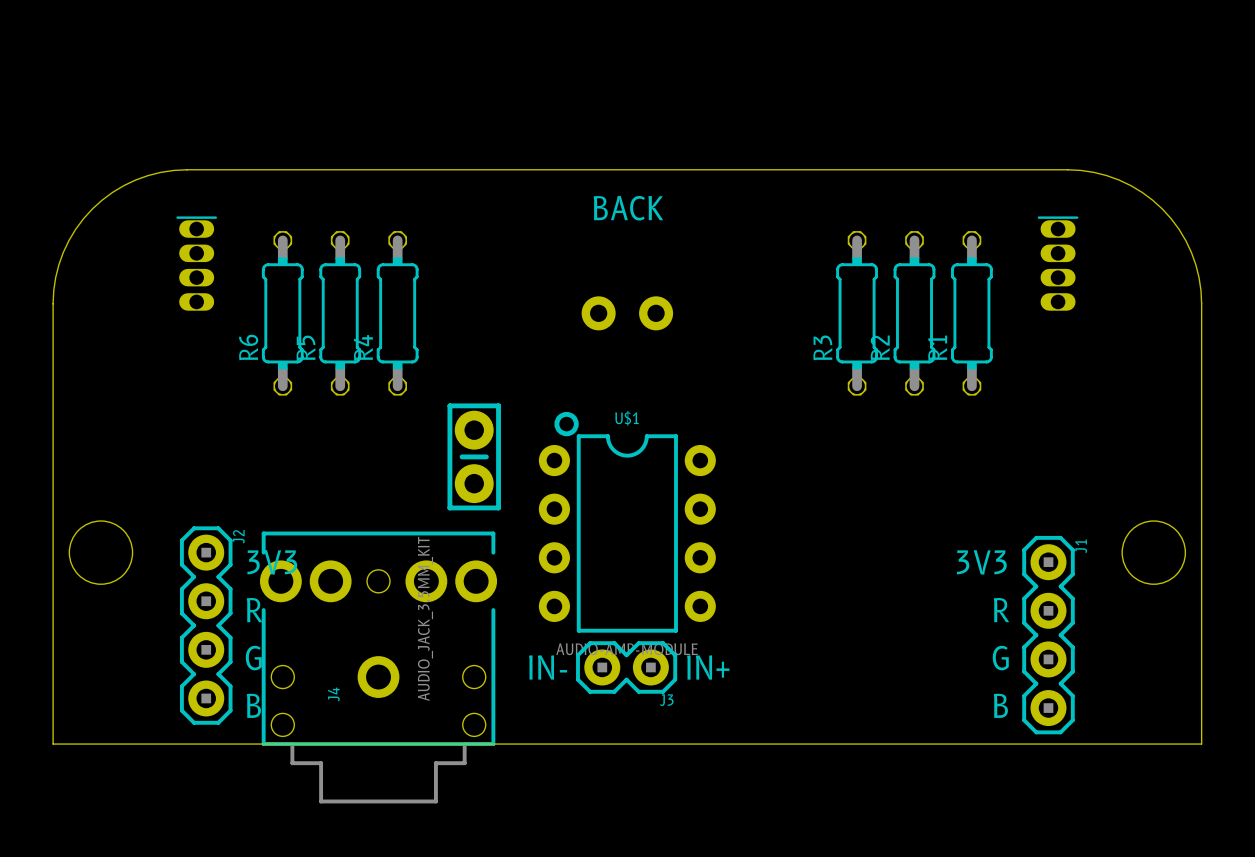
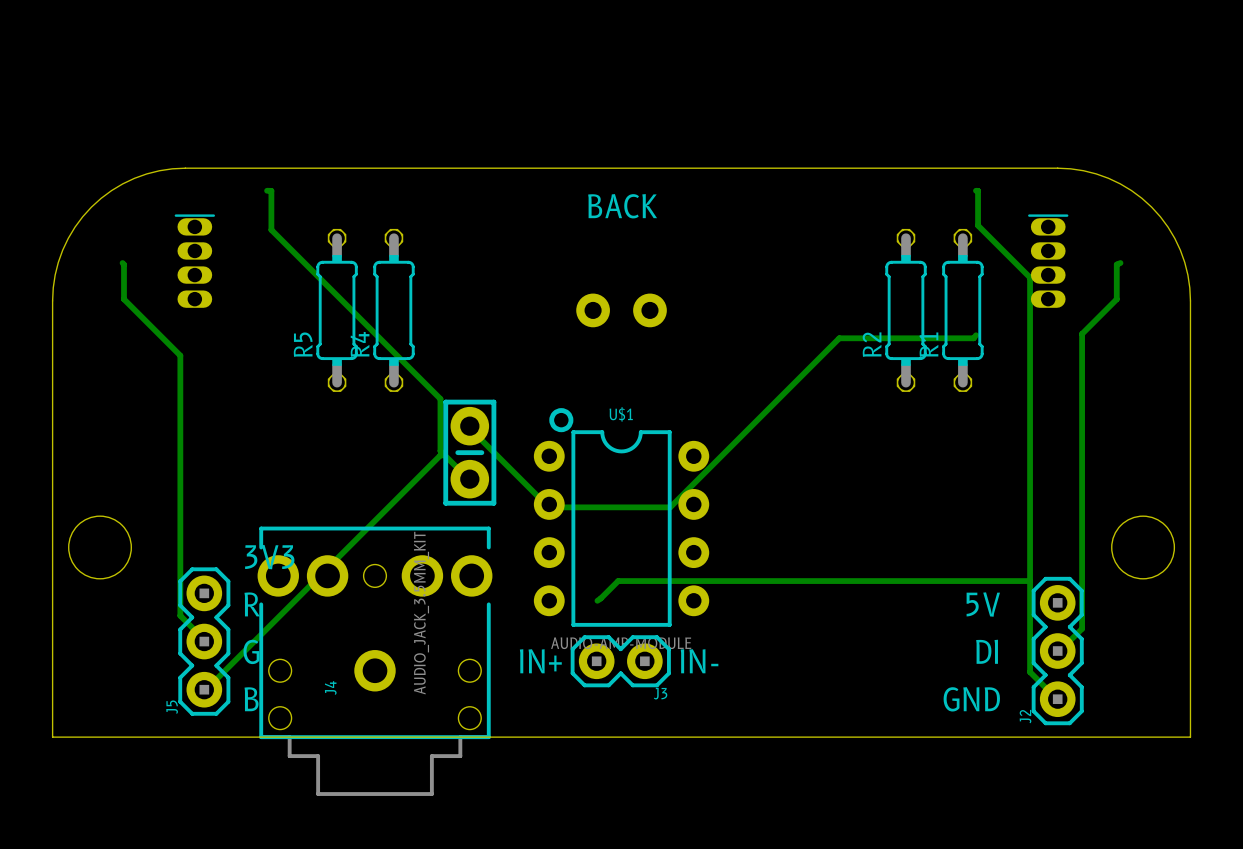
track: none -> (267, 190) (271, 190) (271, 229) (440, 398) (440, 451) (469, 479)
track: none -> (975, 190) (978, 190) (978, 225) (1030, 277) (1030, 672) (1057, 699)
track: none -> (122, 263) (123, 299) (180, 355) (180, 615) (204, 641)
track: none -> (1120, 263) (1116, 264) (1116, 299) (1082, 333) (1082, 628) (1057, 651)
R6: (282, 313) -> none
R3: (857, 313) -> none
track: none -> (975, 335) (973, 338) (839, 338) (670, 507) (548, 507) (469, 426)
track: none -> (444, 455) (440, 455) (204, 689)
J2 footprint: [179, 526, 233, 725] -> [1031, 576, 1084, 726]
J2 name position: J2 (238, 536) -> J2 (1025, 716)
text: 3V3 (981, 562) -> none
track: none -> (1030, 581) (618, 581) (597, 600)
text: R (1001, 610) -> 5V (983, 604)
J1: (1048, 635) -> none
J5: none -> (204, 641)
text: G (1000, 658) -> DI (987, 651)
text: IN- (548, 667) -> IN+ (540, 661)
text: IN+ (708, 667) -> IN- (699, 661)
text: B (1000, 705) -> GND (971, 699)

